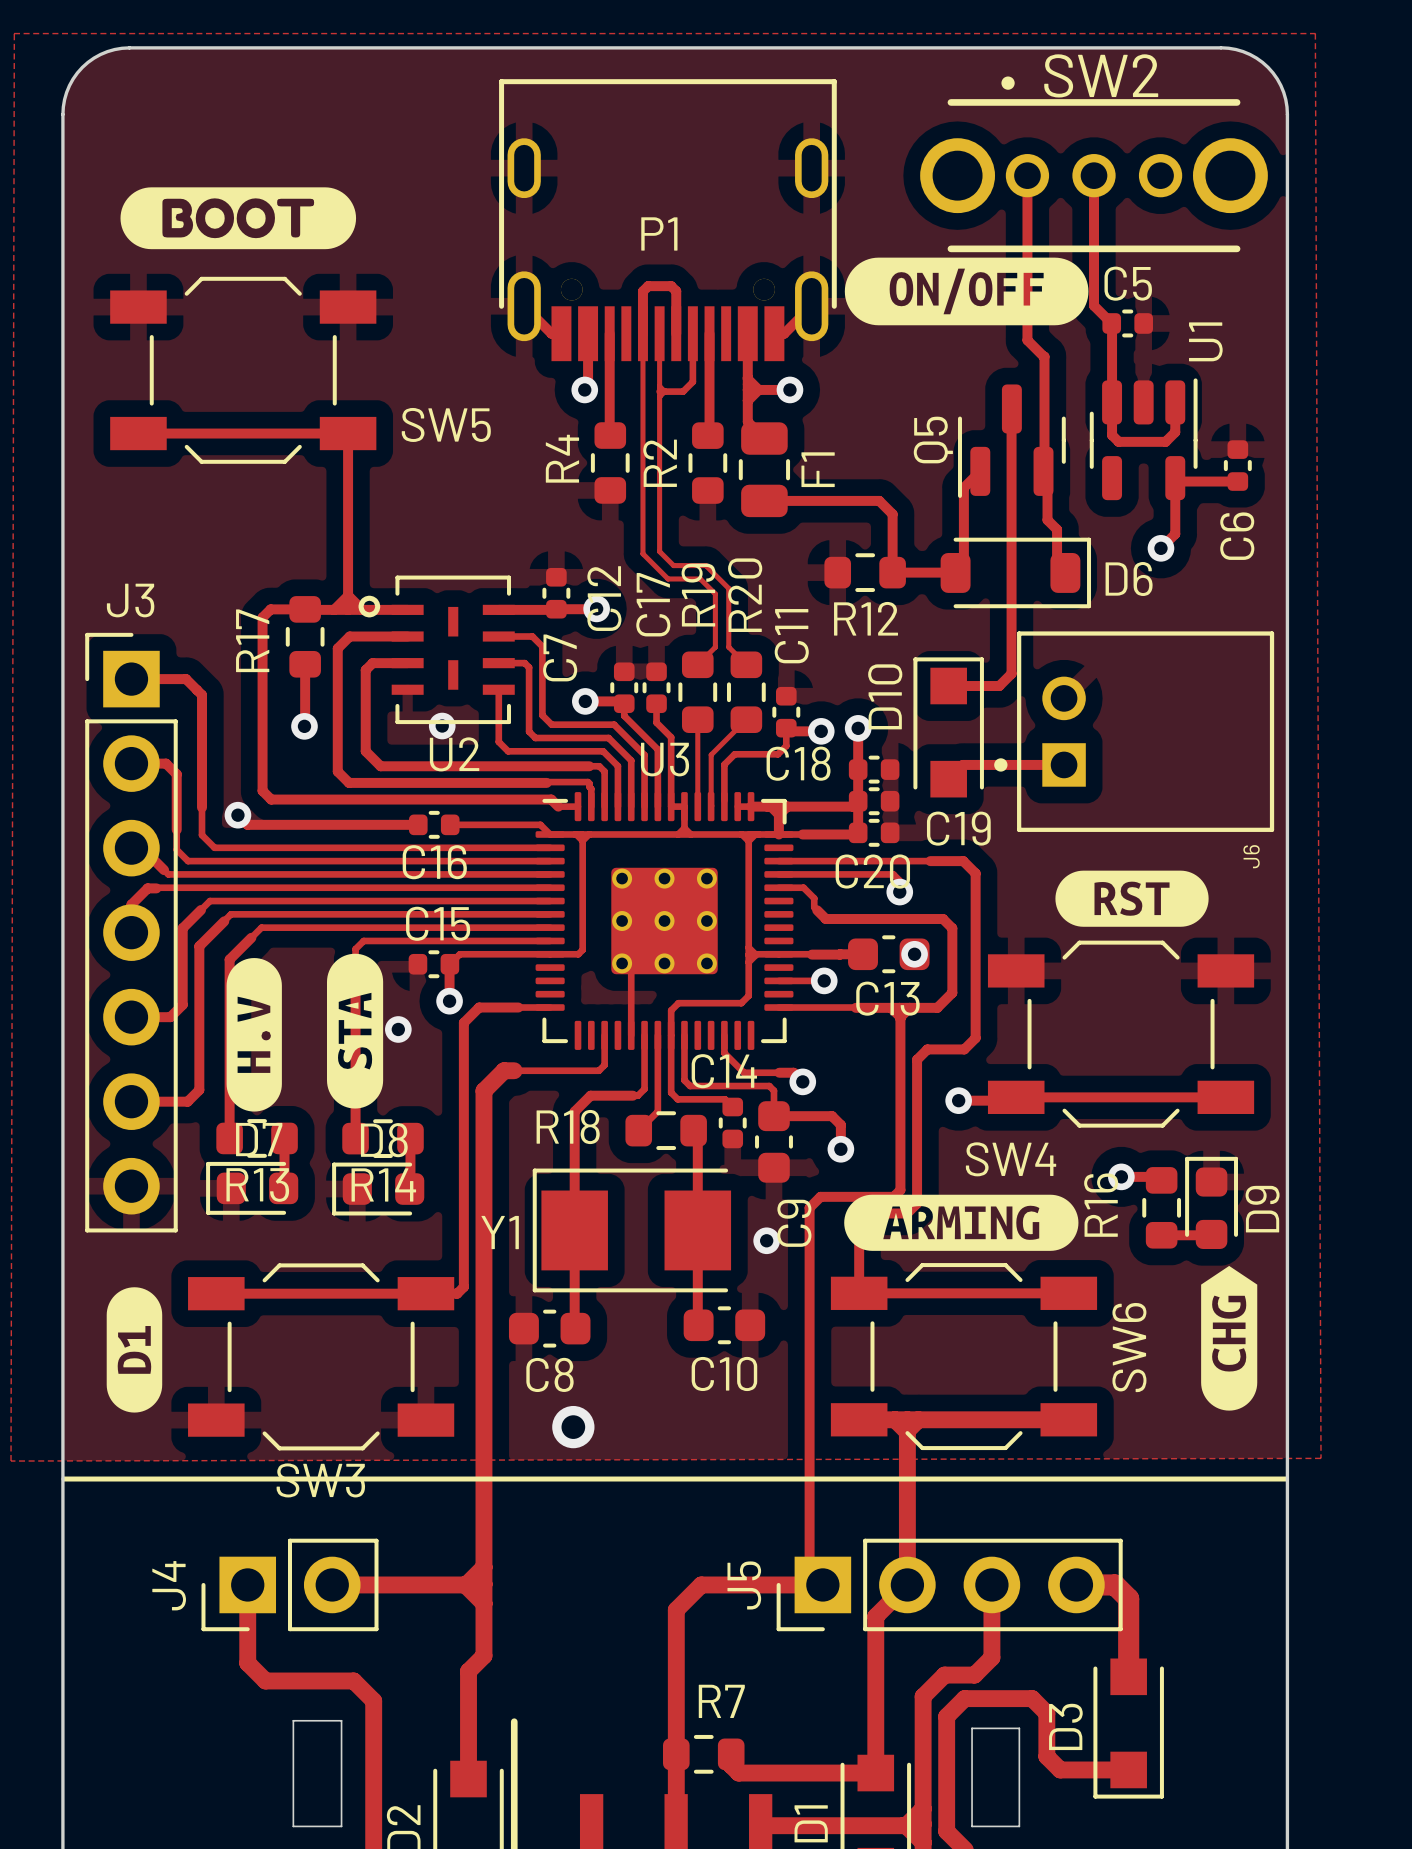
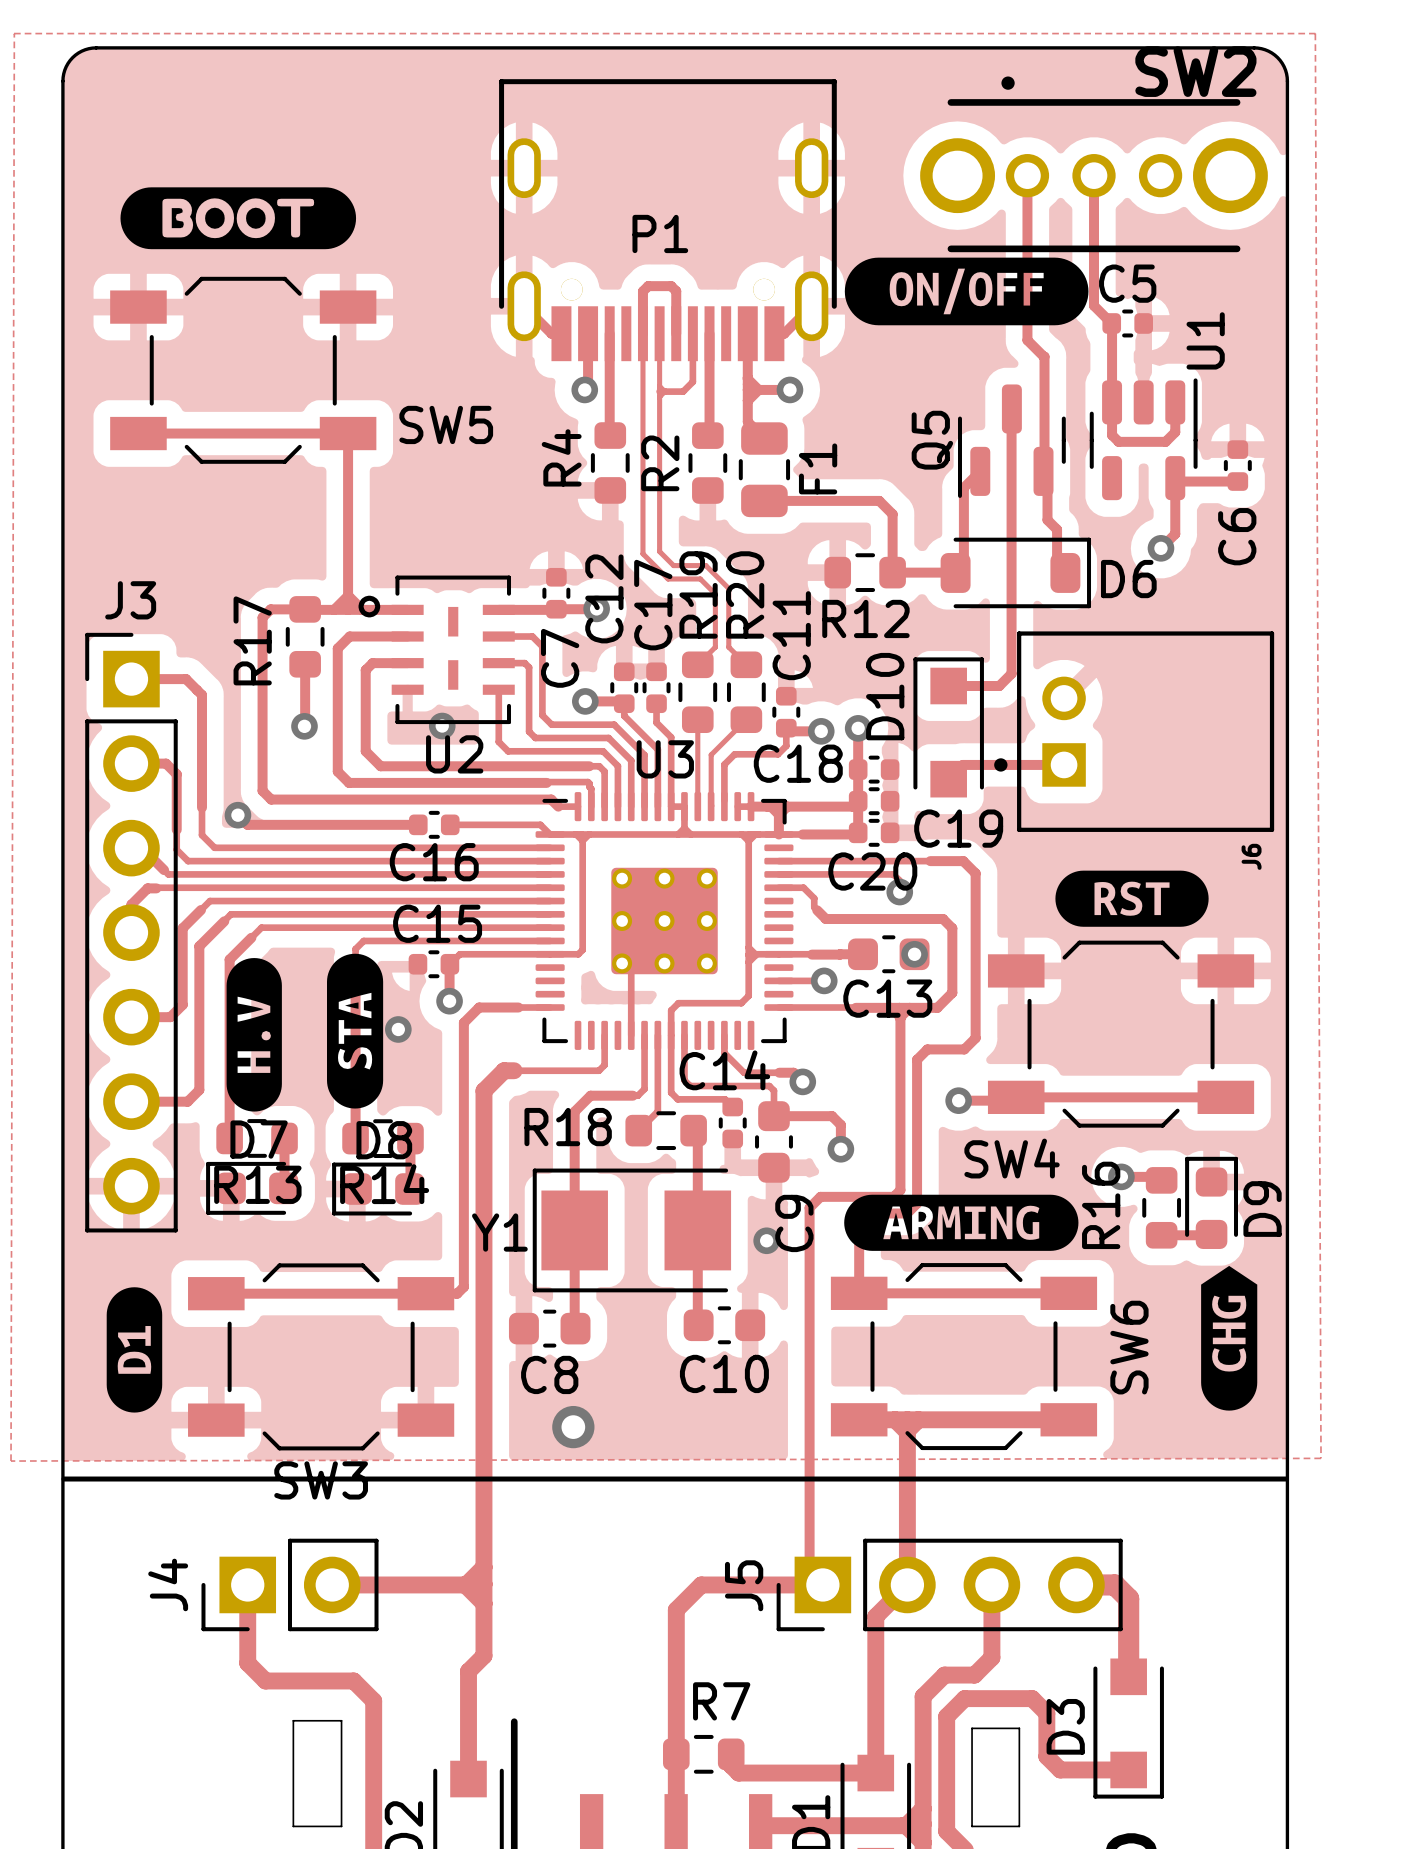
board edge: (129, 47) (114, 49) (100, 54) (82, 67) (69, 85) (64, 99) (62, 114) -> (129, 47) (88, 48) (72, 57) (63, 73) (62, 114)
board edge: (1221, 47) (1243, 51) (1256, 58) (1268, 67) (1280, 85) (1285, 99) (1287, 114) -> (1220, 47) (1261, 48) (1277, 57) (1286, 73) (1287, 114)
SW2 name position: SW2 (1101, 75) -> SW2 (1195, 71)

